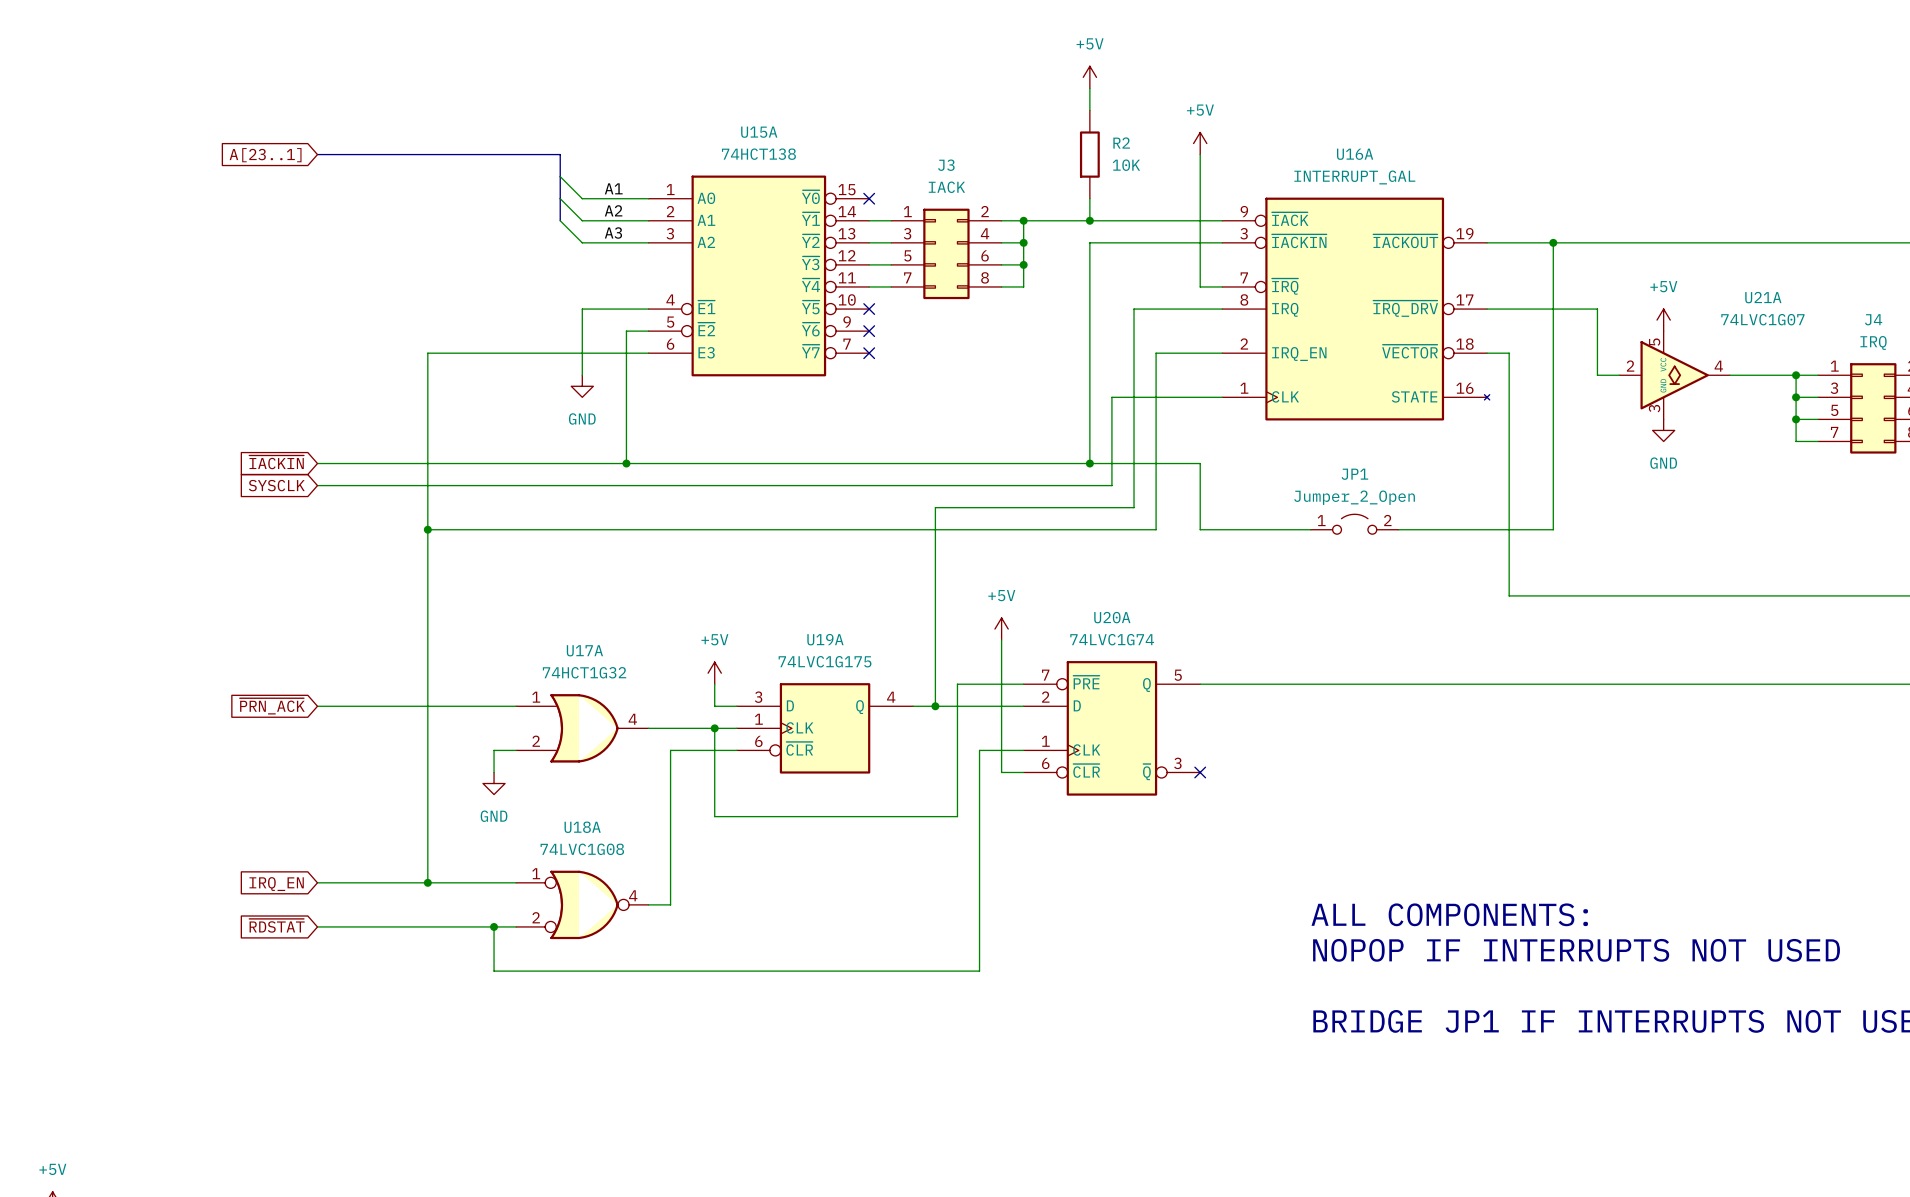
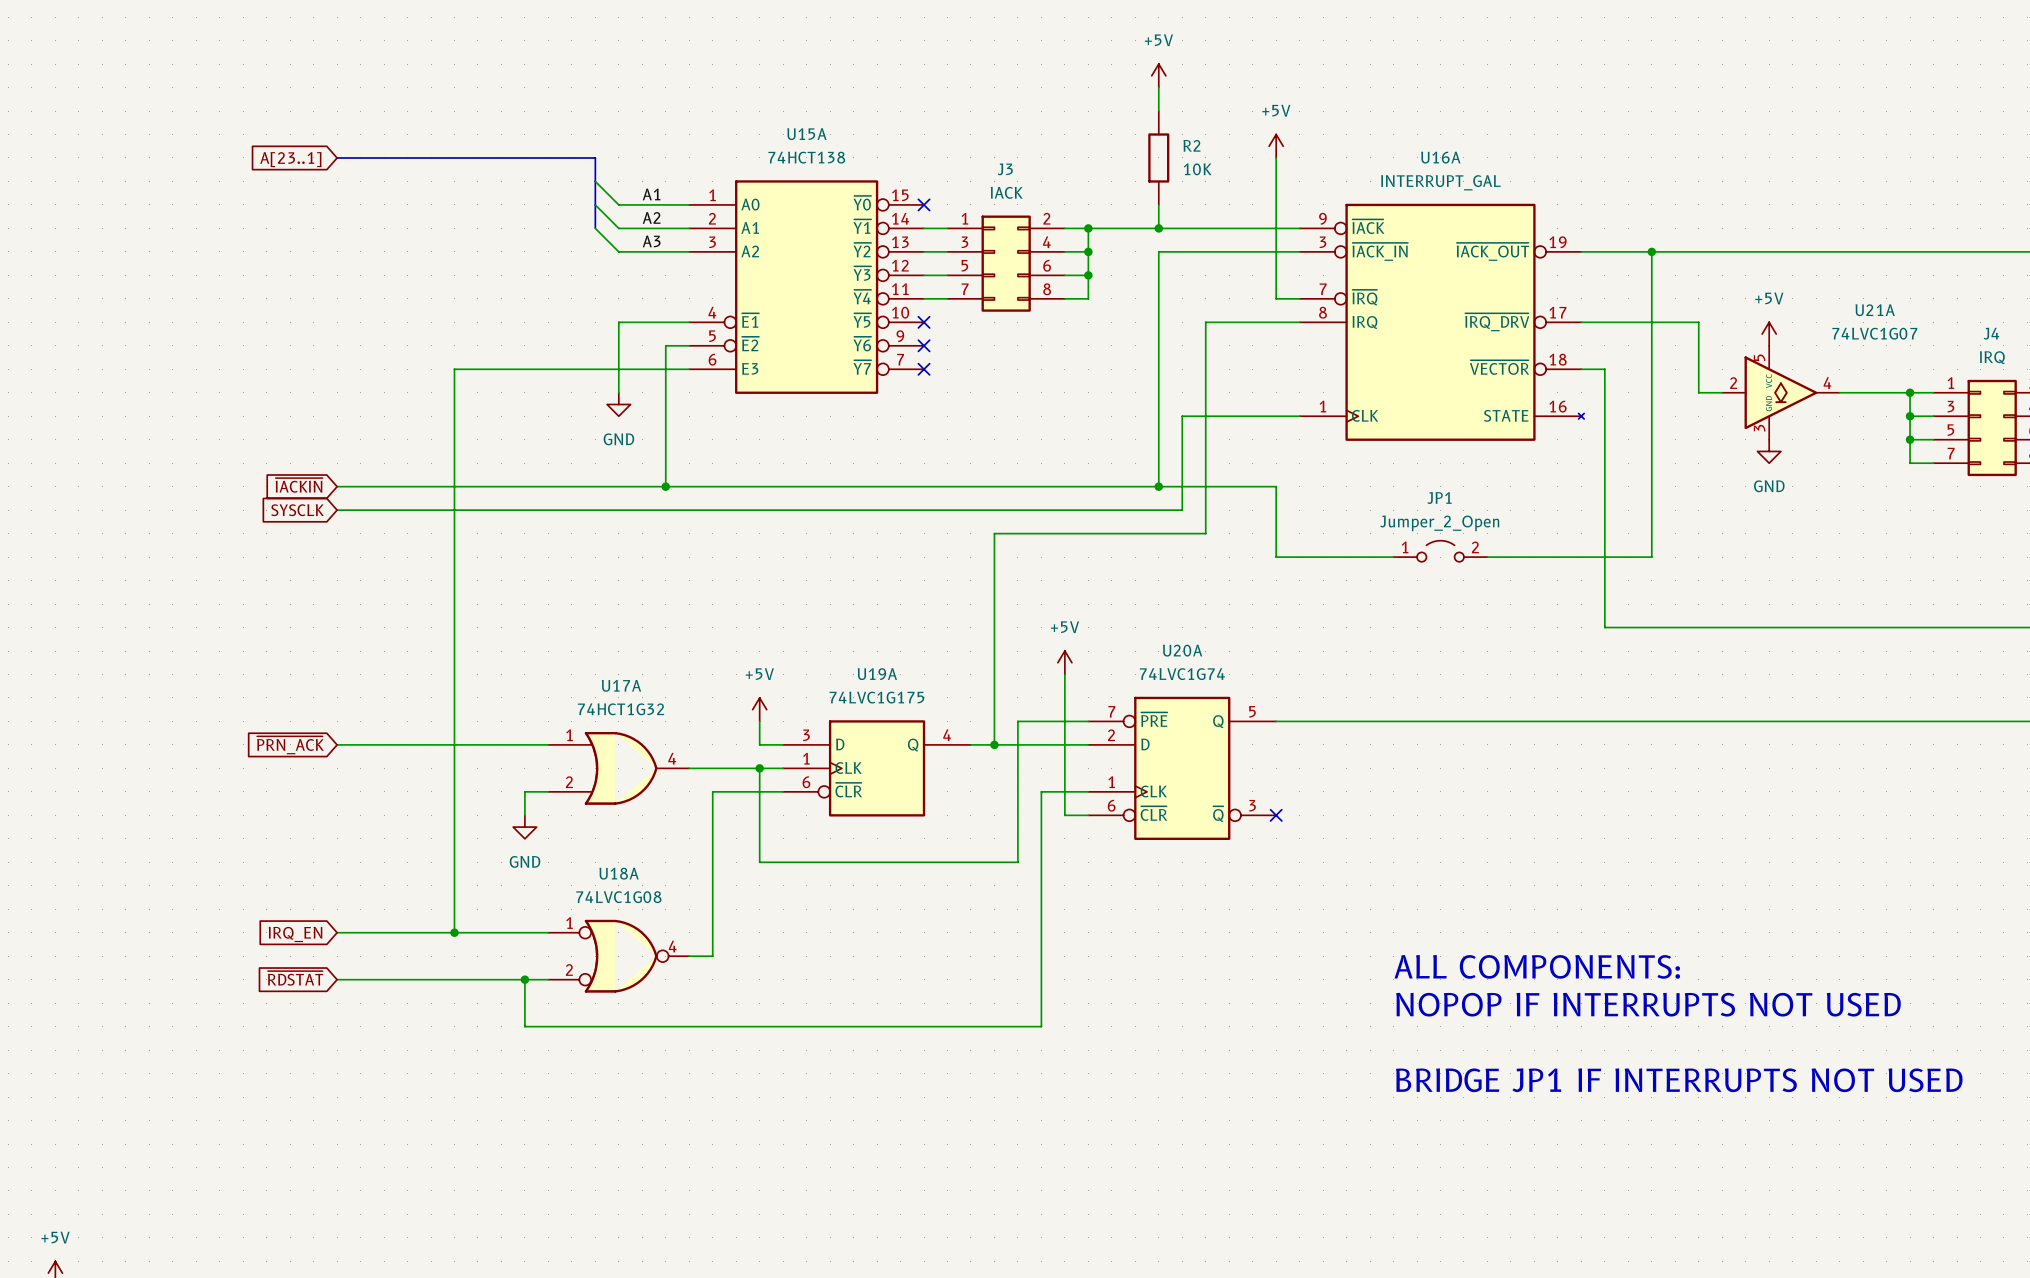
U16A symbol: [1222, 197, 1490, 421] -> [1299, 203, 1585, 441]
wire: (1222, 353) (1156, 353) (1156, 529) (427, 529) -> none
junction: (427, 529) -> none

